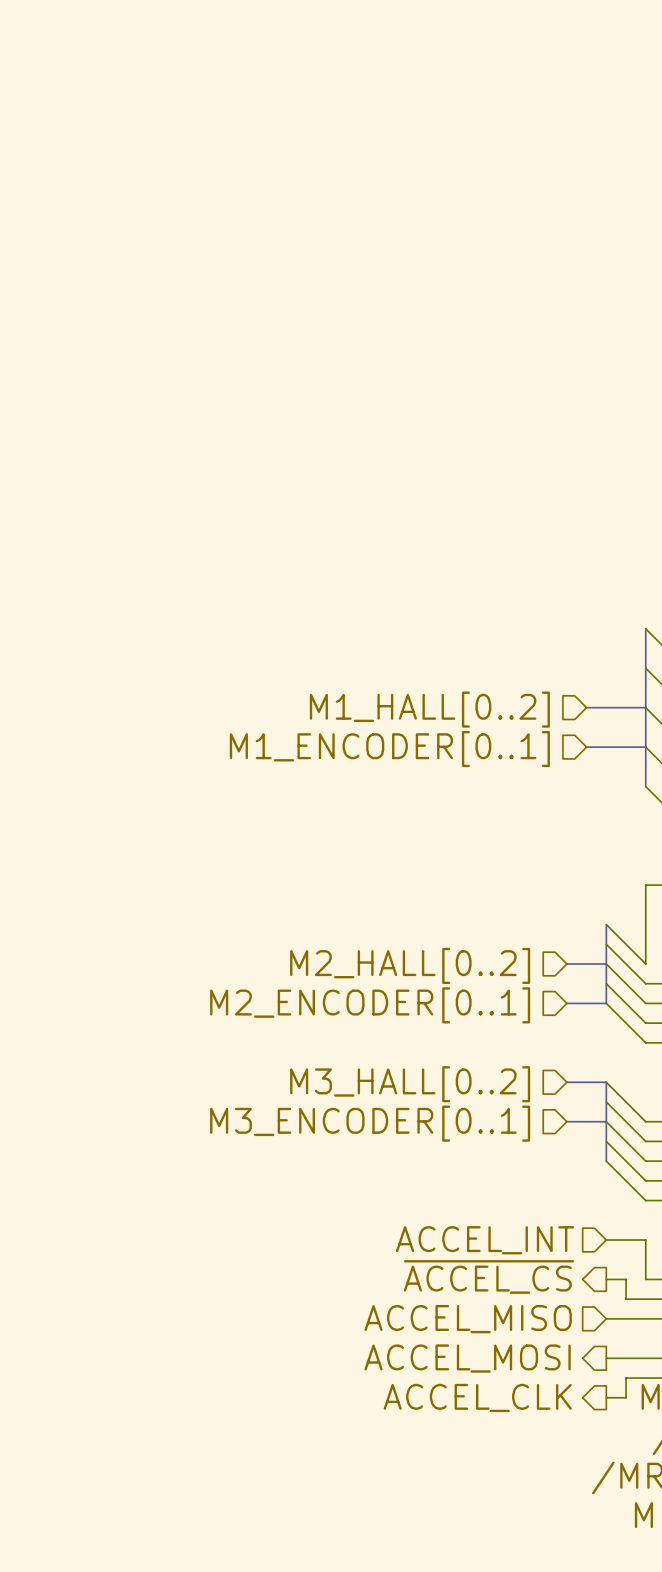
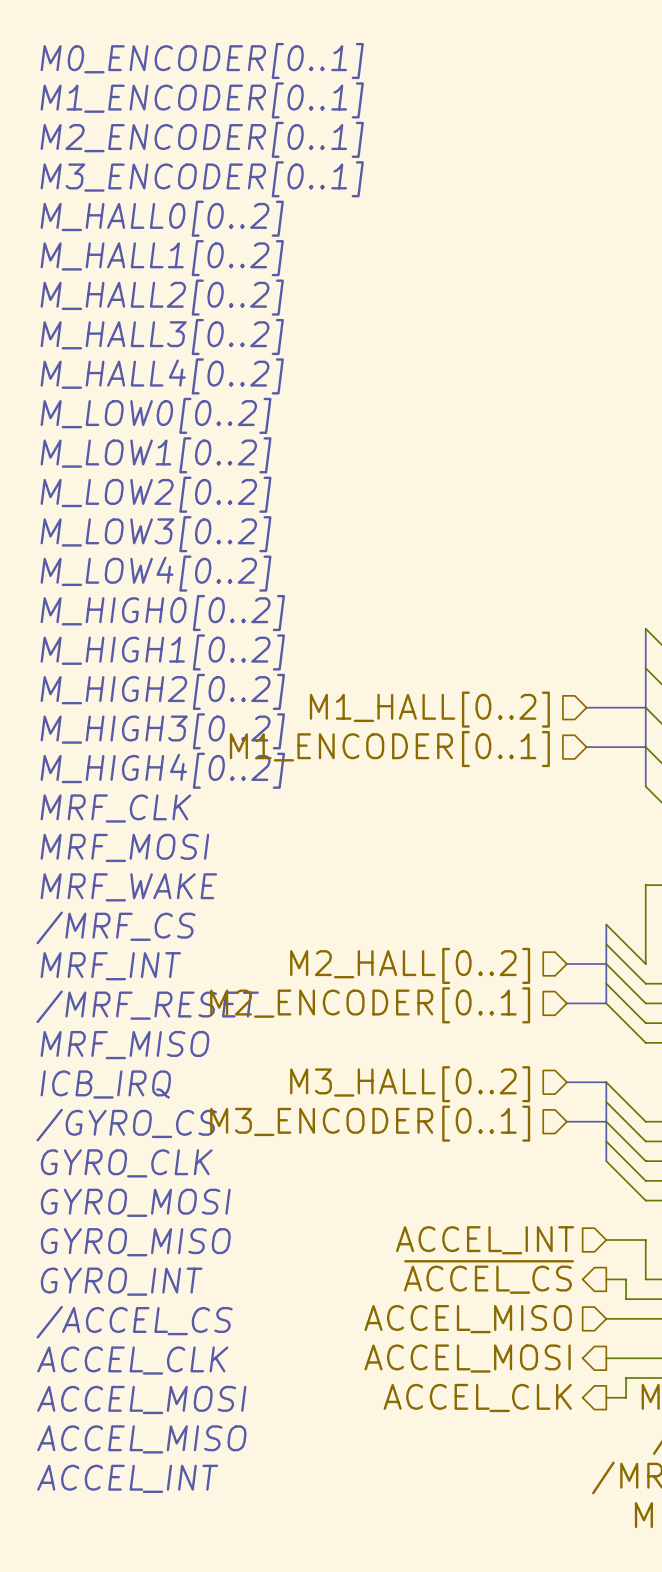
text: none -> M0_ENCODER[0..1] (202, 60)
text: none -> M1_ENCODER[0..1] (202, 100)
text: none -> M2_ENCODER[0..1] (202, 139)
text: none -> M3_ENCODER[0..1] (202, 179)
text: none -> M_HALL0[0..2] (162, 218)
text: none -> M_HALL1[0..2] (162, 258)
text: none -> M_HALL2[0..2] (162, 297)
text: none -> M_HALL3[0..2] (162, 337)
text: none -> M_HALL4[0..2] (162, 376)
text: none -> M_LOW0[0..2] (156, 415)
text: none -> M_LOW1[0..2] (156, 455)
text: none -> M_LOW2[0..2] (156, 494)
text: none -> M_LOW3[0..2] (156, 534)
text: none -> M_LOW4[0..2] (156, 573)
text: none -> M_HIGH0[0..2] (162, 613)
text: none -> M_HIGH1[0..2] (162, 652)
text: none -> M_HIGH2[0..2] (162, 691)
text: none -> M_HIGH3[0..2] (162, 731)
text: none -> M_HIGH4[0..2] (162, 770)
text: none -> MRF_CLK (115, 808)
text: none -> MRF_MOSI (124, 847)
text: none -> MRF_WAKE (128, 887)
text: none -> /MRF_CS (116, 927)
text: none -> MRF_INT (110, 966)
text: none -> /MRF_RESET (147, 1006)
text: none -> MRF_MISO (124, 1045)
text: none -> ICB_IRQ (105, 1084)
text: none -> /GYRO_CS (126, 1125)
text: none -> GYRO_CLK (126, 1163)
text: none -> GYRO_MOSI (135, 1202)
text: none -> GYRO_MISO (135, 1242)
text: none -> GYRO_INT (121, 1281)
text: none -> /ACCEL_CS (134, 1322)
text: none -> ACCEL_CLK (132, 1360)
text: none -> ACCEL_MOSI (141, 1399)
text: none -> ACCEL_MISO (141, 1439)
text: none -> ACCEL_INT (127, 1478)

